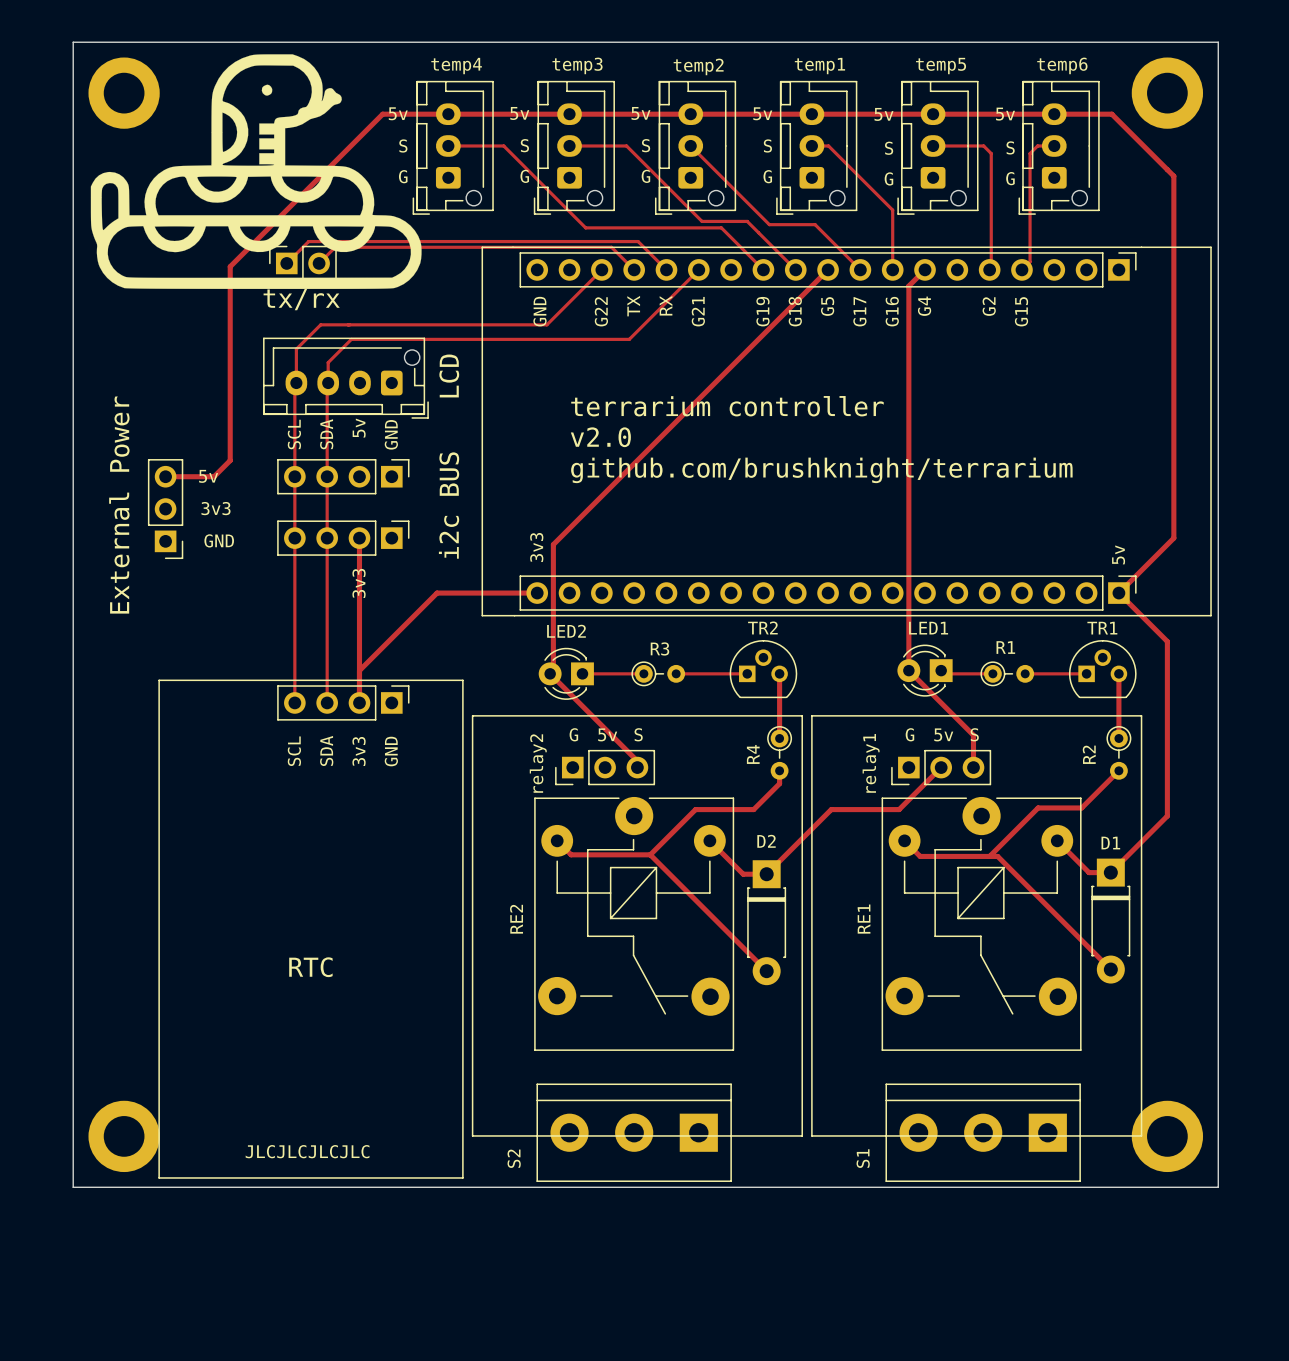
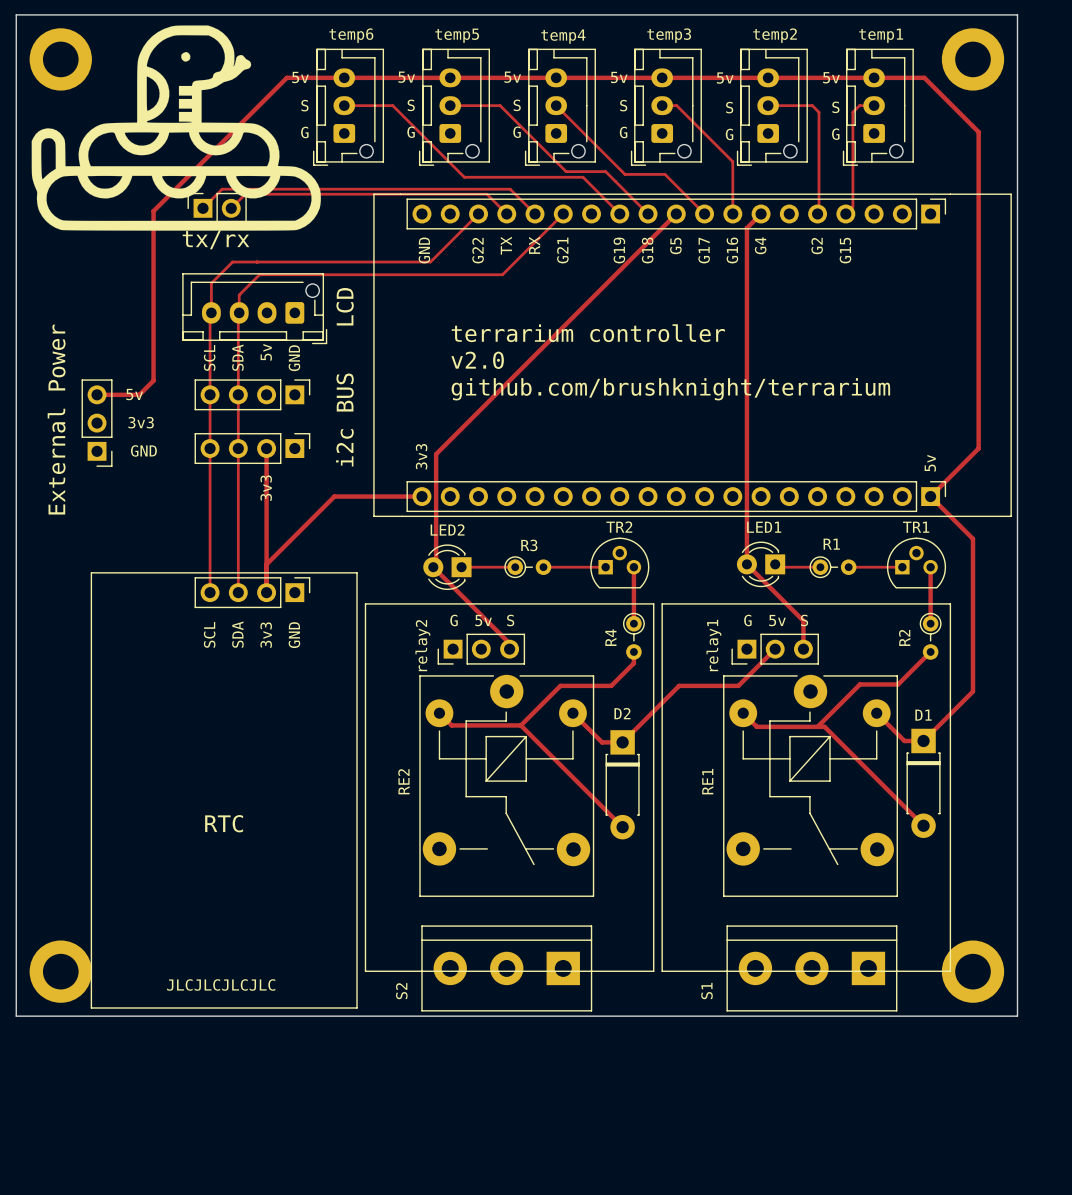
temp3 name: temp3 (577, 65) -> temp5 (457, 35)
temp6 name: temp6 (1062, 65) -> temp1 (881, 35)
temp4 name: temp4 (456, 66) -> temp6 (351, 35)
temp2 name: temp2 (698, 66) -> temp4 (563, 36)
temp1 name: temp1 (819, 66) -> temp3 (669, 35)
temp5 name: temp5 (941, 66) -> temp2 (775, 35)

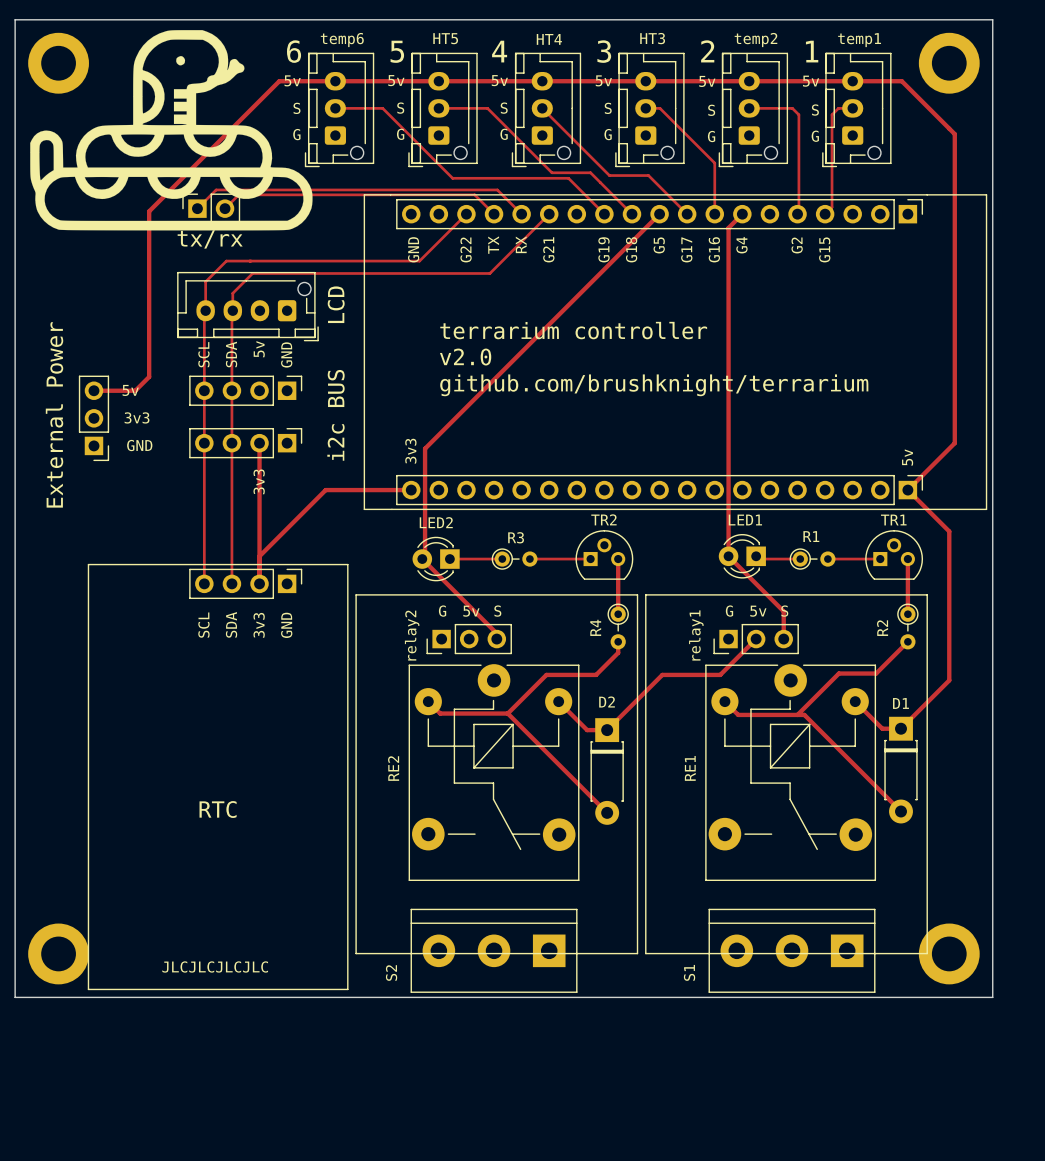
temp5 name: temp5 (457, 35) -> HT5 (445, 38)
temp3 name: temp3 (669, 35) -> HT3 (652, 38)
temp4 name: temp4 (563, 36) -> HT4 (549, 39)
text: none -> 6 (294, 51)
text: none -> 5 (397, 51)
text: none -> 4 (499, 51)
text: none -> 3 (604, 51)
text: none -> 2 (707, 51)
text: none -> 1 (812, 51)

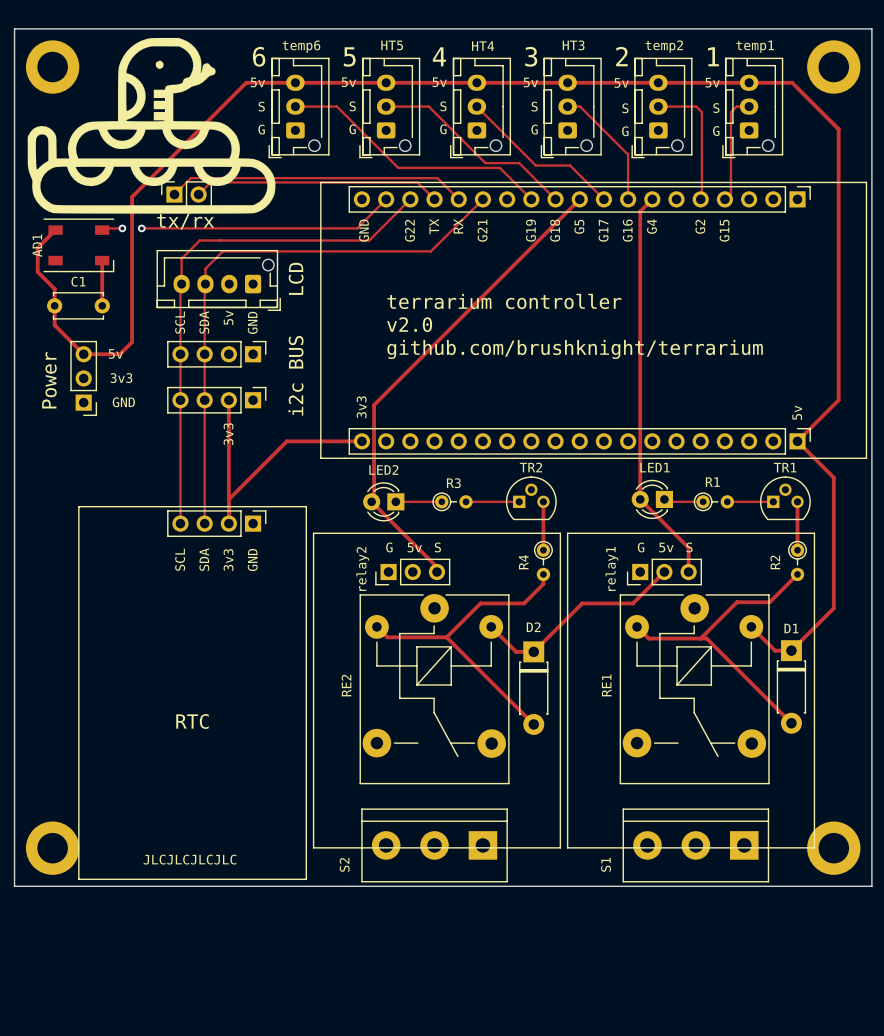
track: none -> (386, 199) (357, 228) (141, 228)
track: none -> (122, 228) (103, 228) (102, 230)
via: none -> (122, 228)
via: none -> (141, 228)
track: none -> (55, 230) (37, 247) (37, 271) (54, 288) (54, 325) (83, 354)
AD1: none -> (78, 245)
track: none -> (102, 260) (102, 305)
C1: none -> (78, 305)
text: External Power (54, 414) -> Power (49, 380)

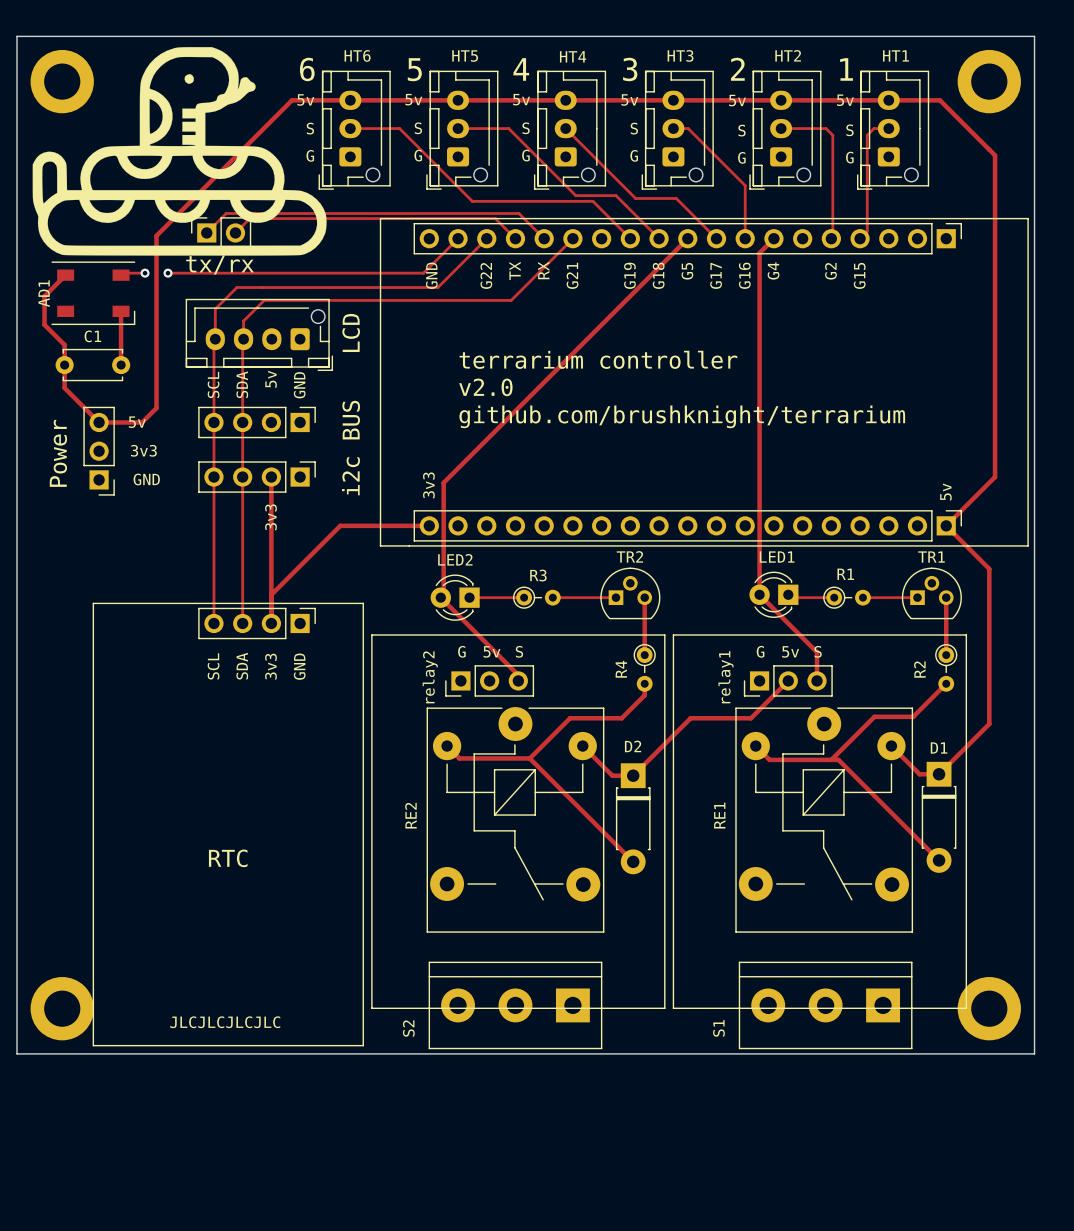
temp6 name: temp6 (301, 46) -> HT6 (357, 55)
temp2 name: temp2 (664, 46) -> HT2 (788, 55)
temp1 name: temp1 (755, 46) -> HT1 (895, 55)

